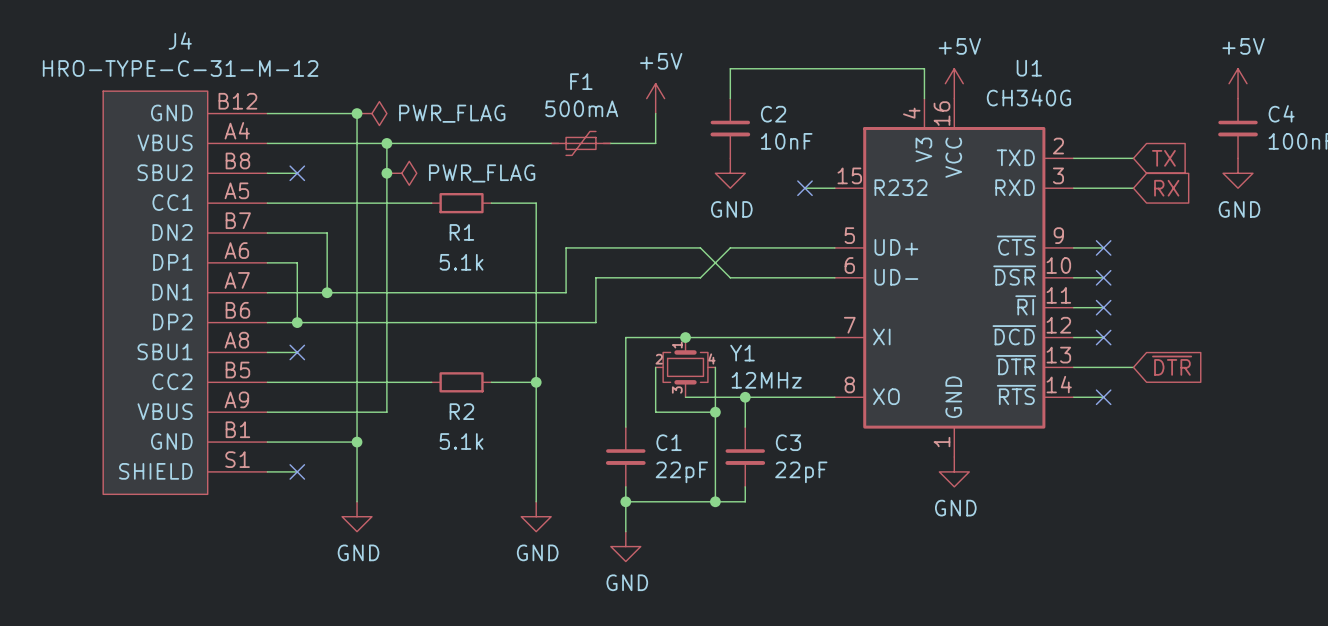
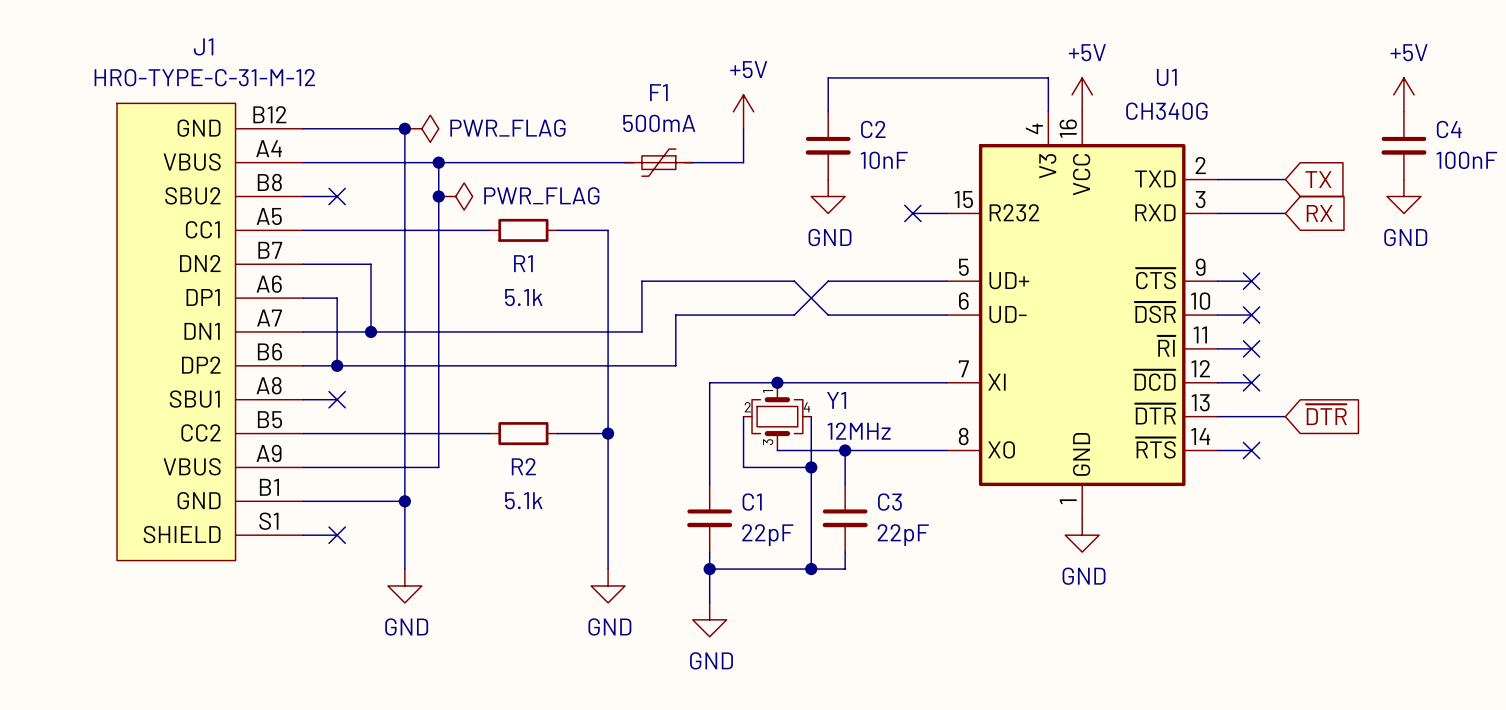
J4 name: J4 (180, 40) -> J1 (203, 46)

